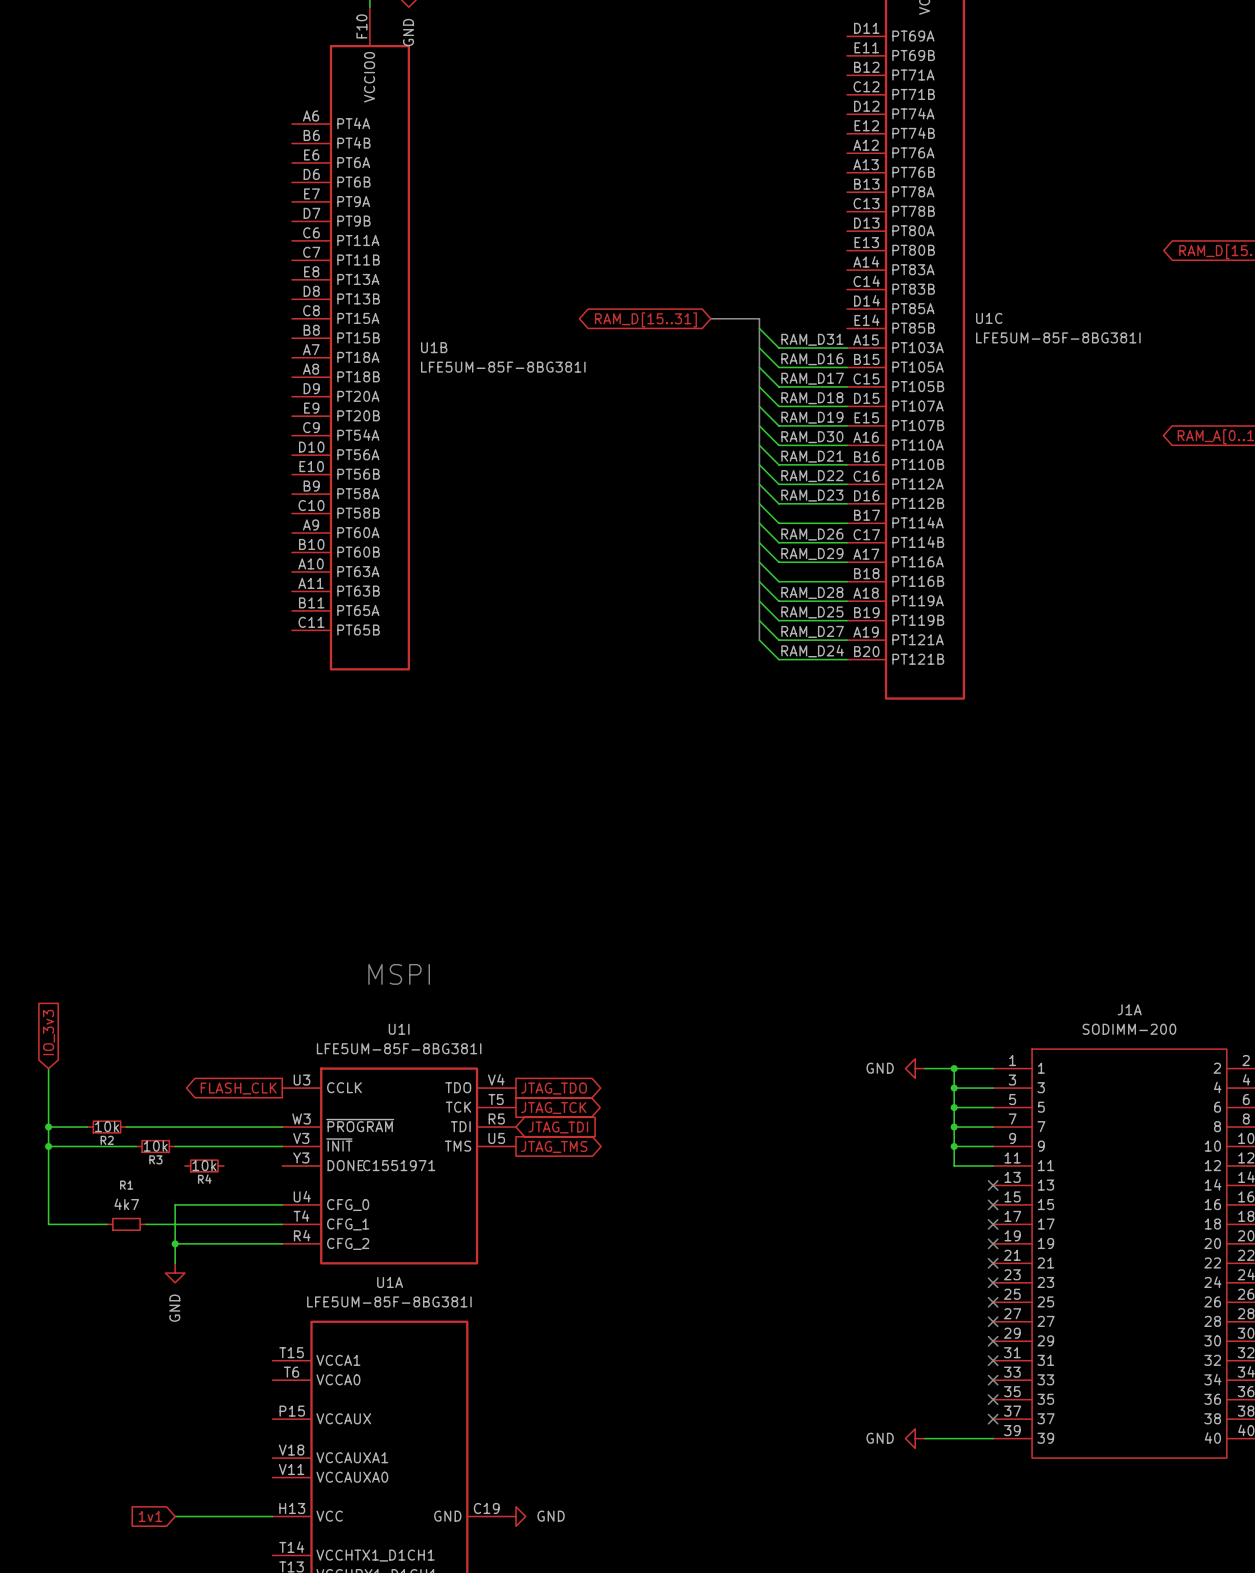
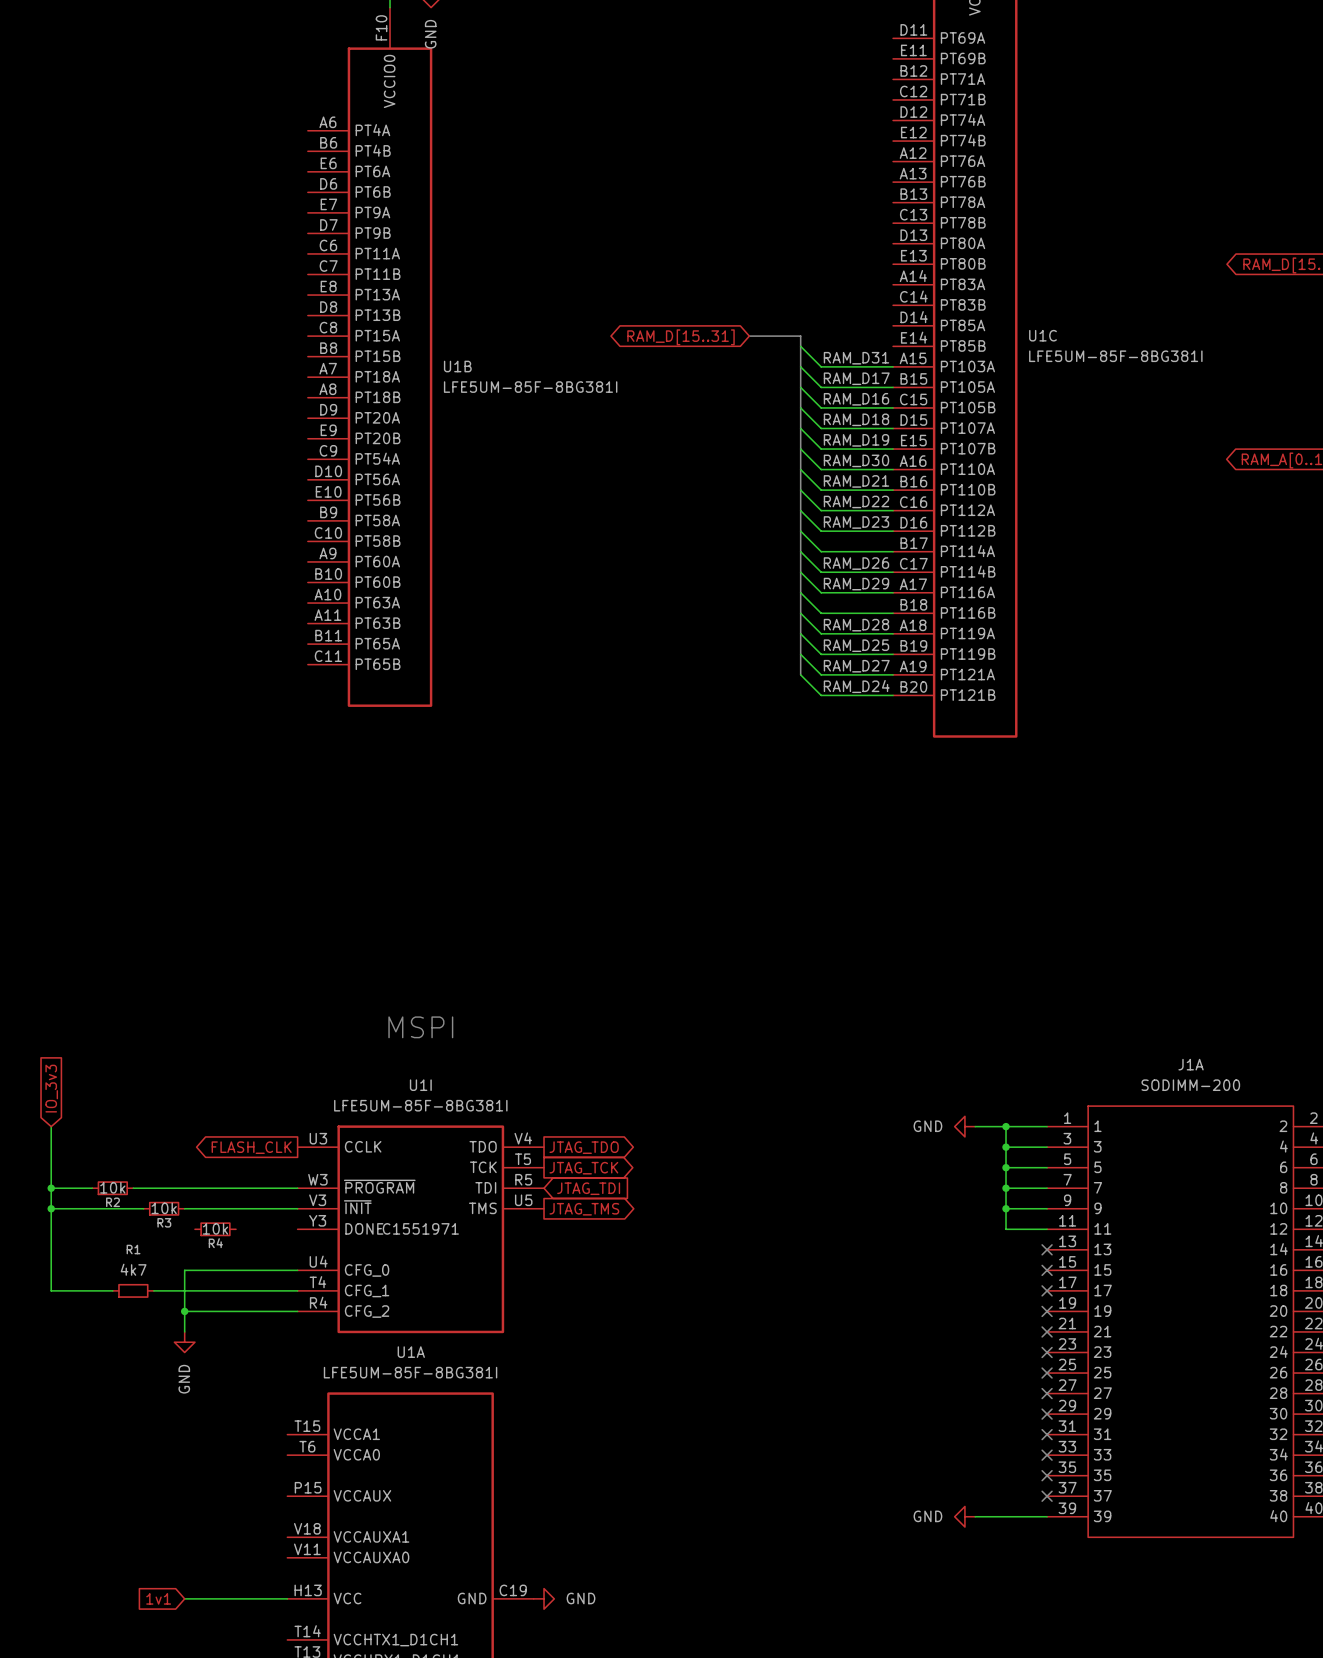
label: RAM_D16 (812, 359) -> RAM_D17 (856, 378)
label: RAM_D17 (812, 378) -> RAM_D16 (856, 399)

